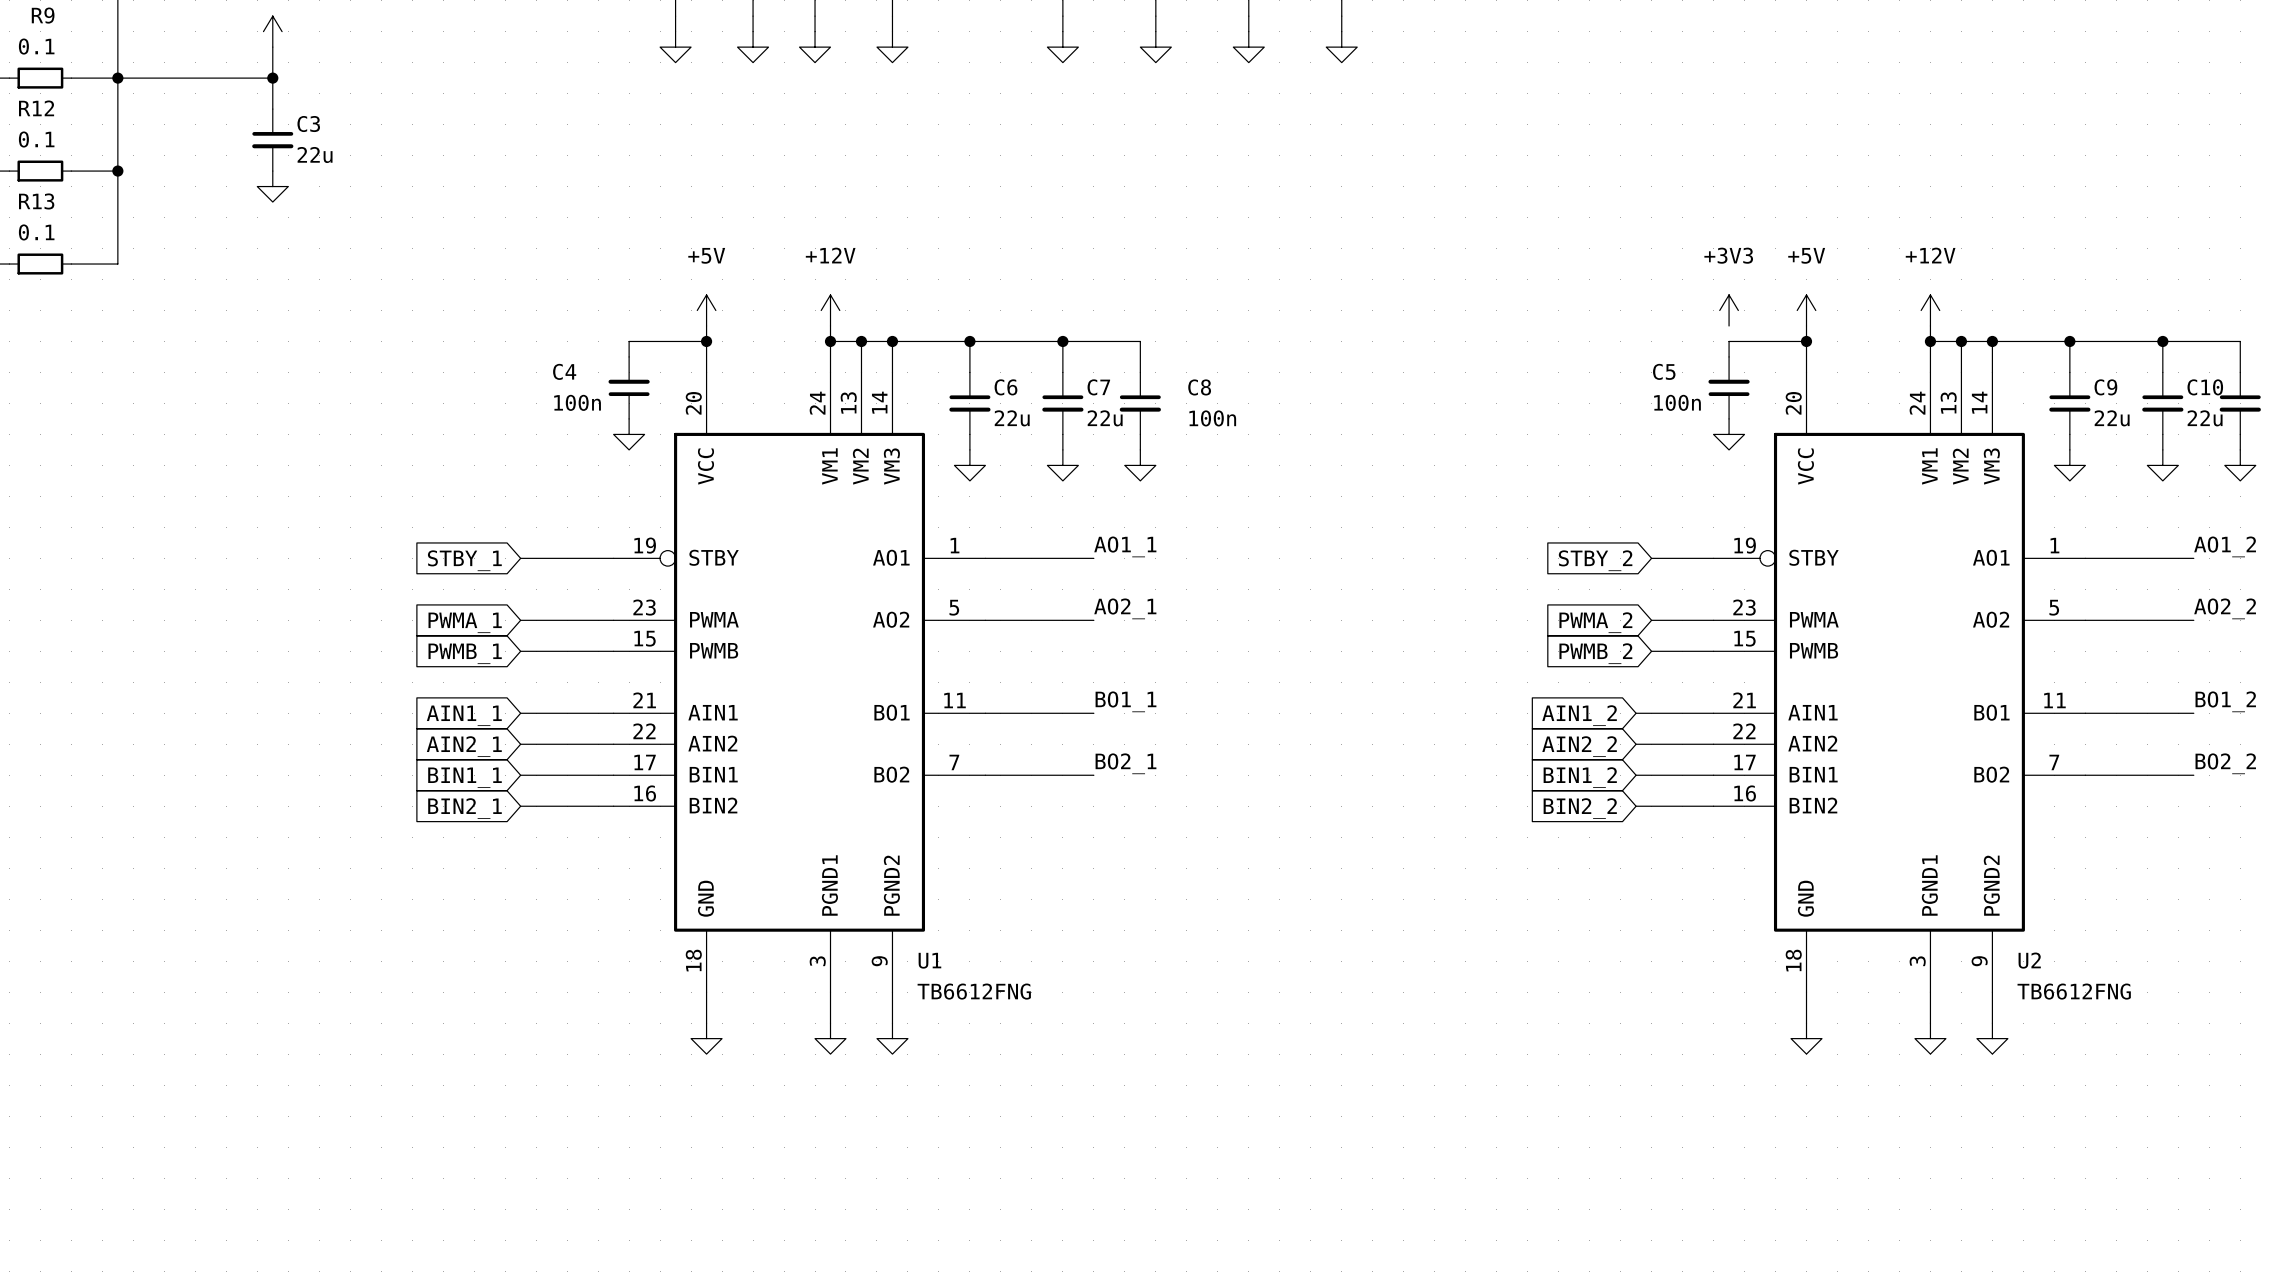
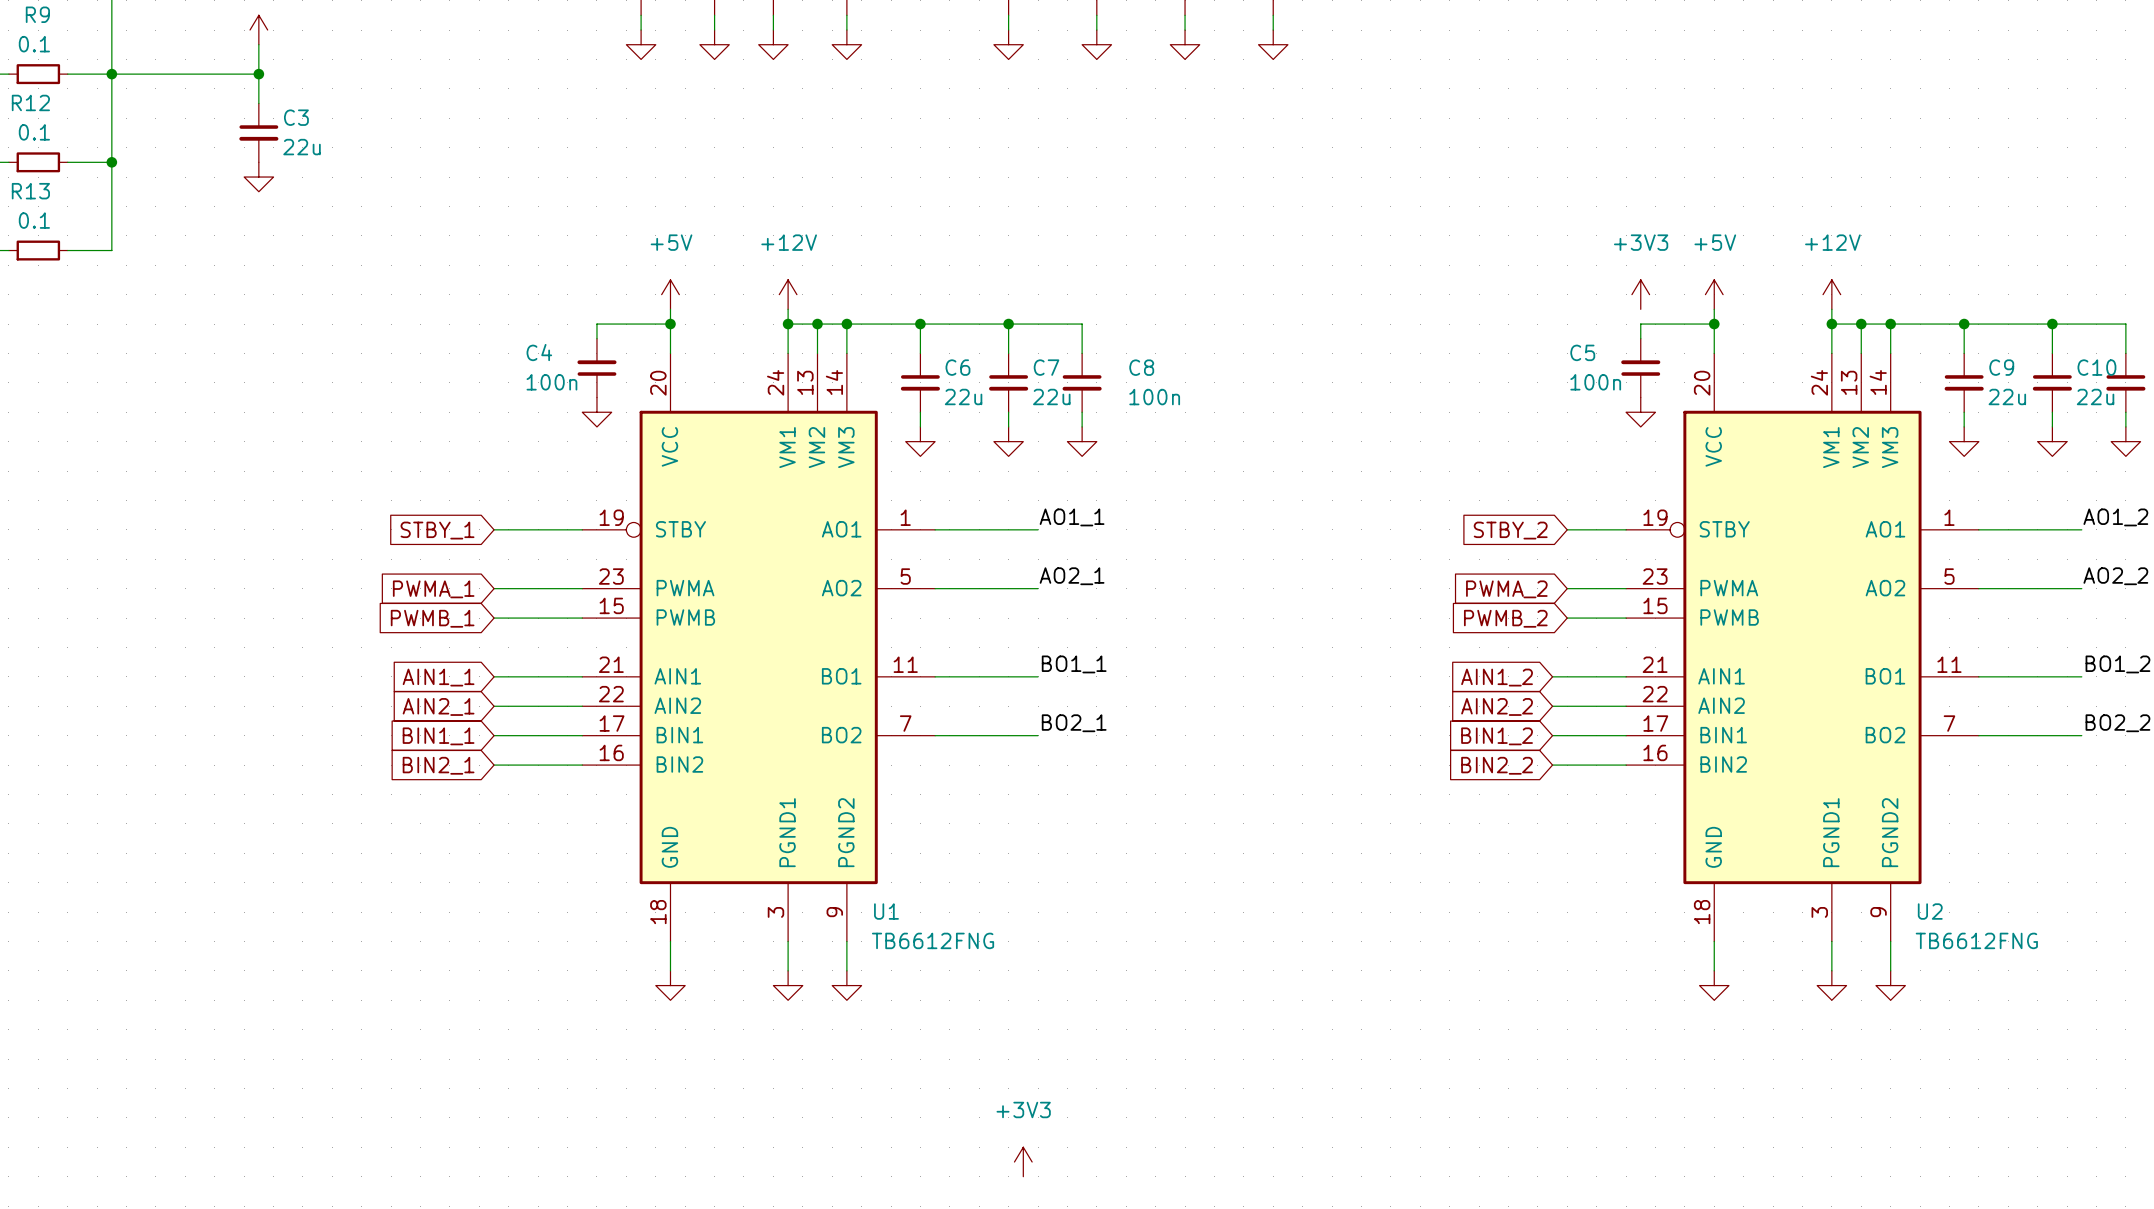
power symbol: none -> +3V3 (1023, 1161)

